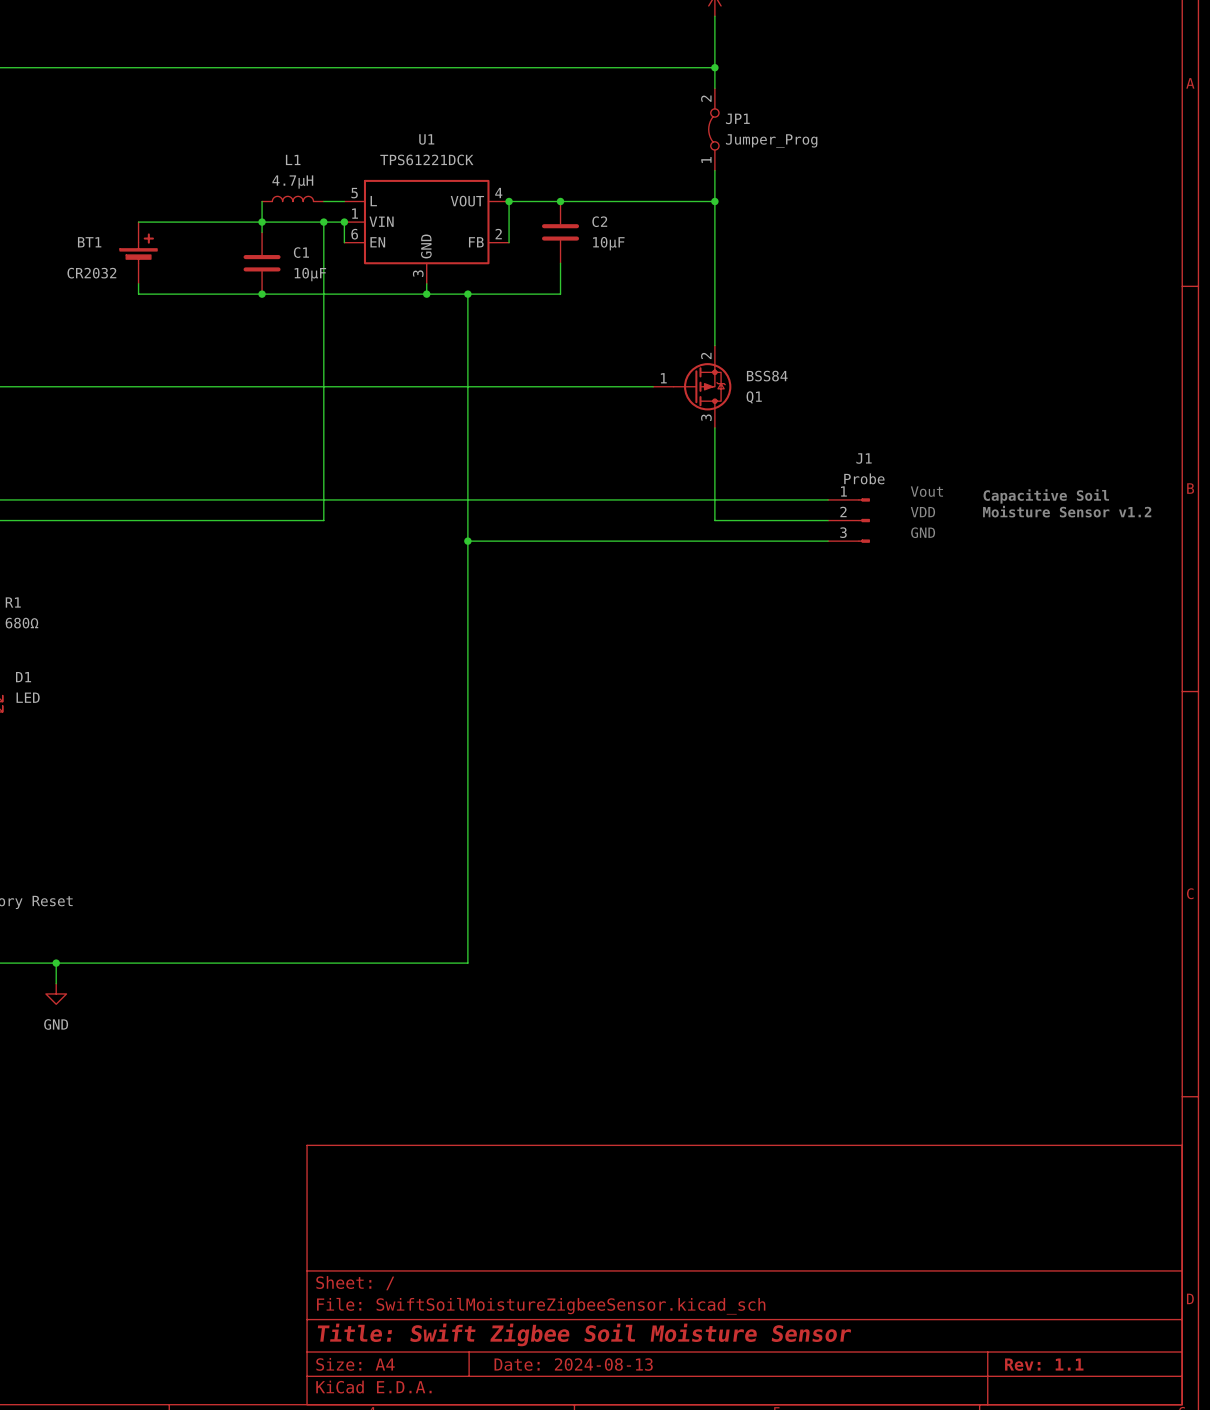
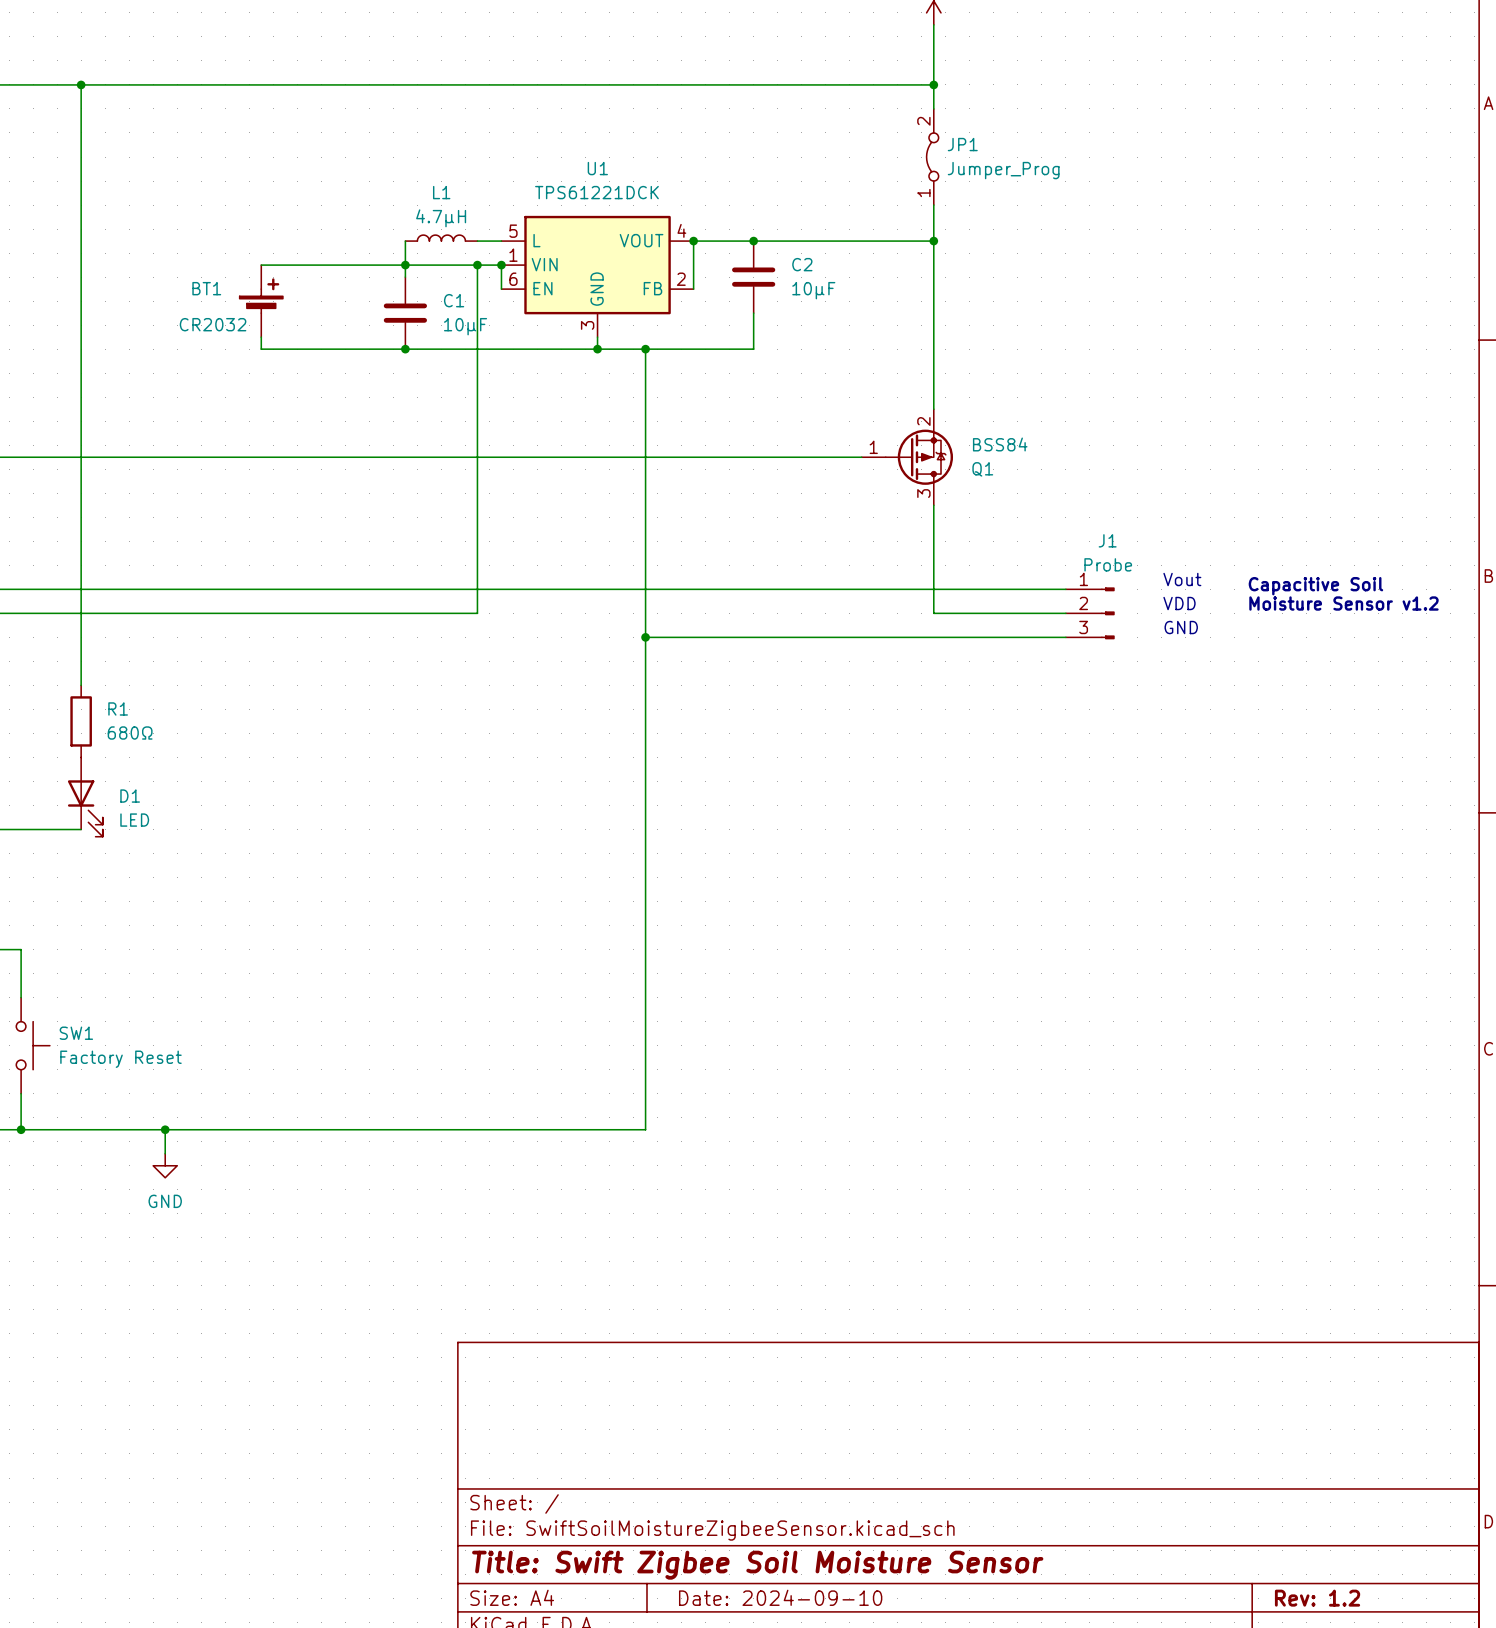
title block: Date: 2024-08-13 (573, 1364) -> Date: 2024-09-10 (780, 1597)
title block: Rev: 1.1 (1044, 1364) -> Rev: 1.2 (1317, 1598)

